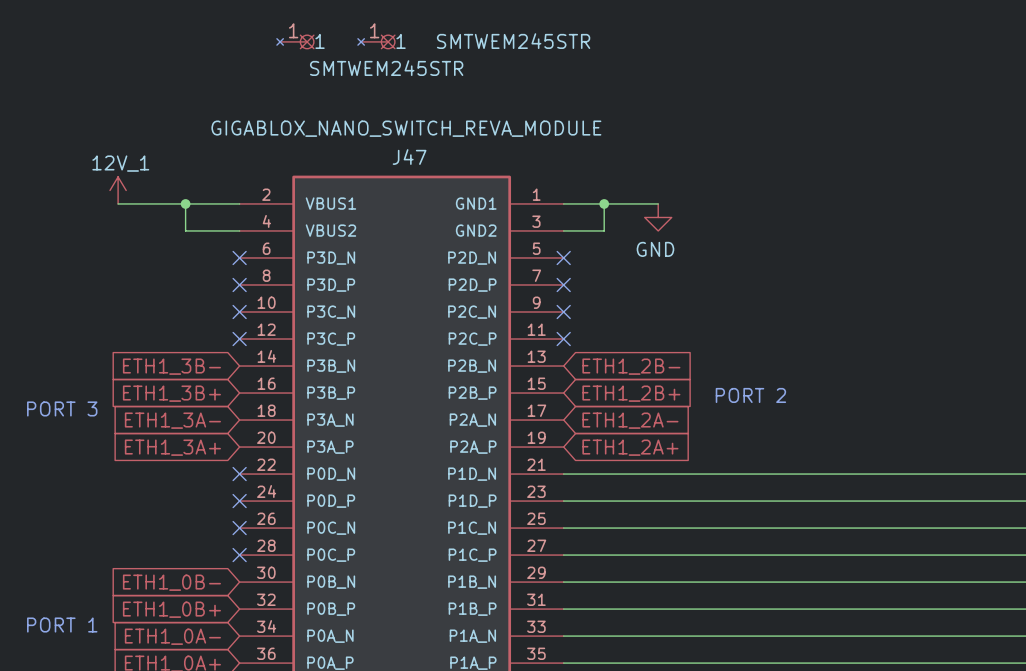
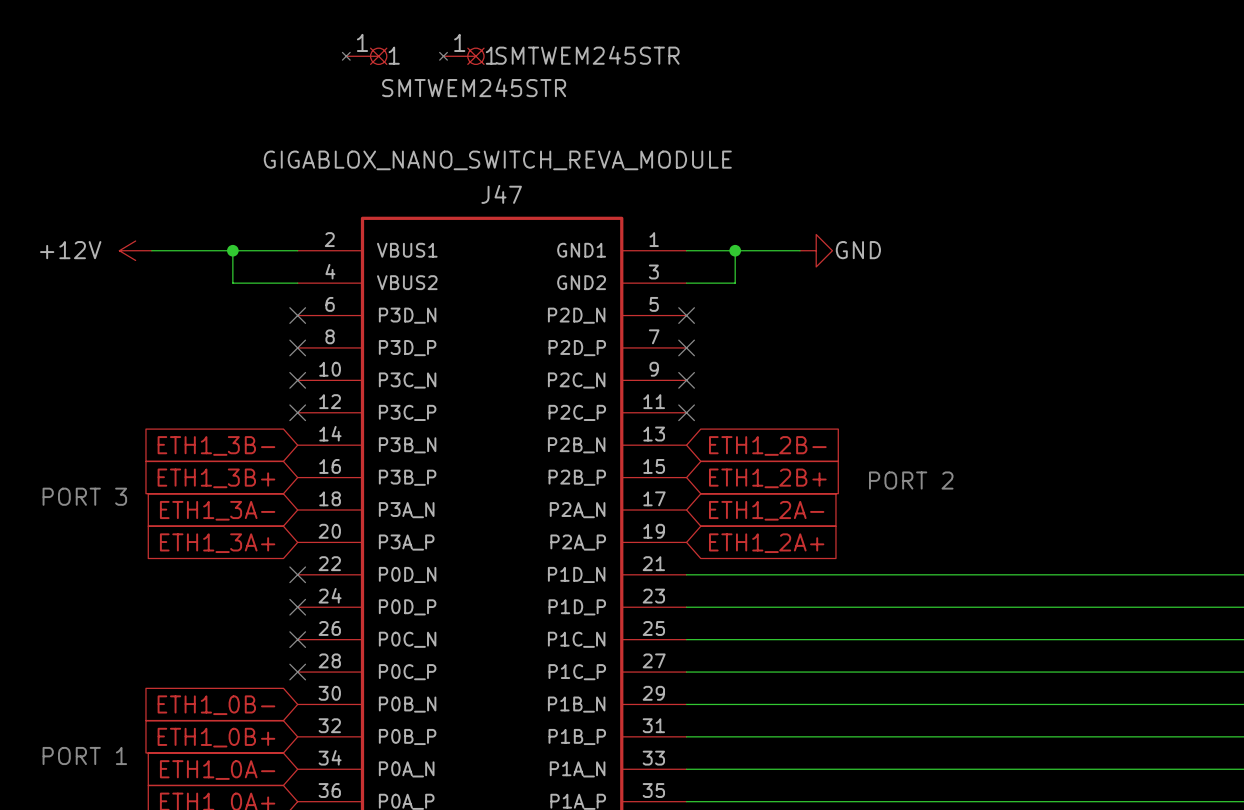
part value position: SMTWEM245STR (513, 41) -> SMTWEM245STR (587, 55)
power symbol: 12V_1 (118, 190) -> none
power symbol: none -> +12V (135, 250)
power symbol rotation: 0° (658, 217) -> 90° counterclockwise (816, 250)
power symbol position: GND (658, 217) -> GND (816, 250)

